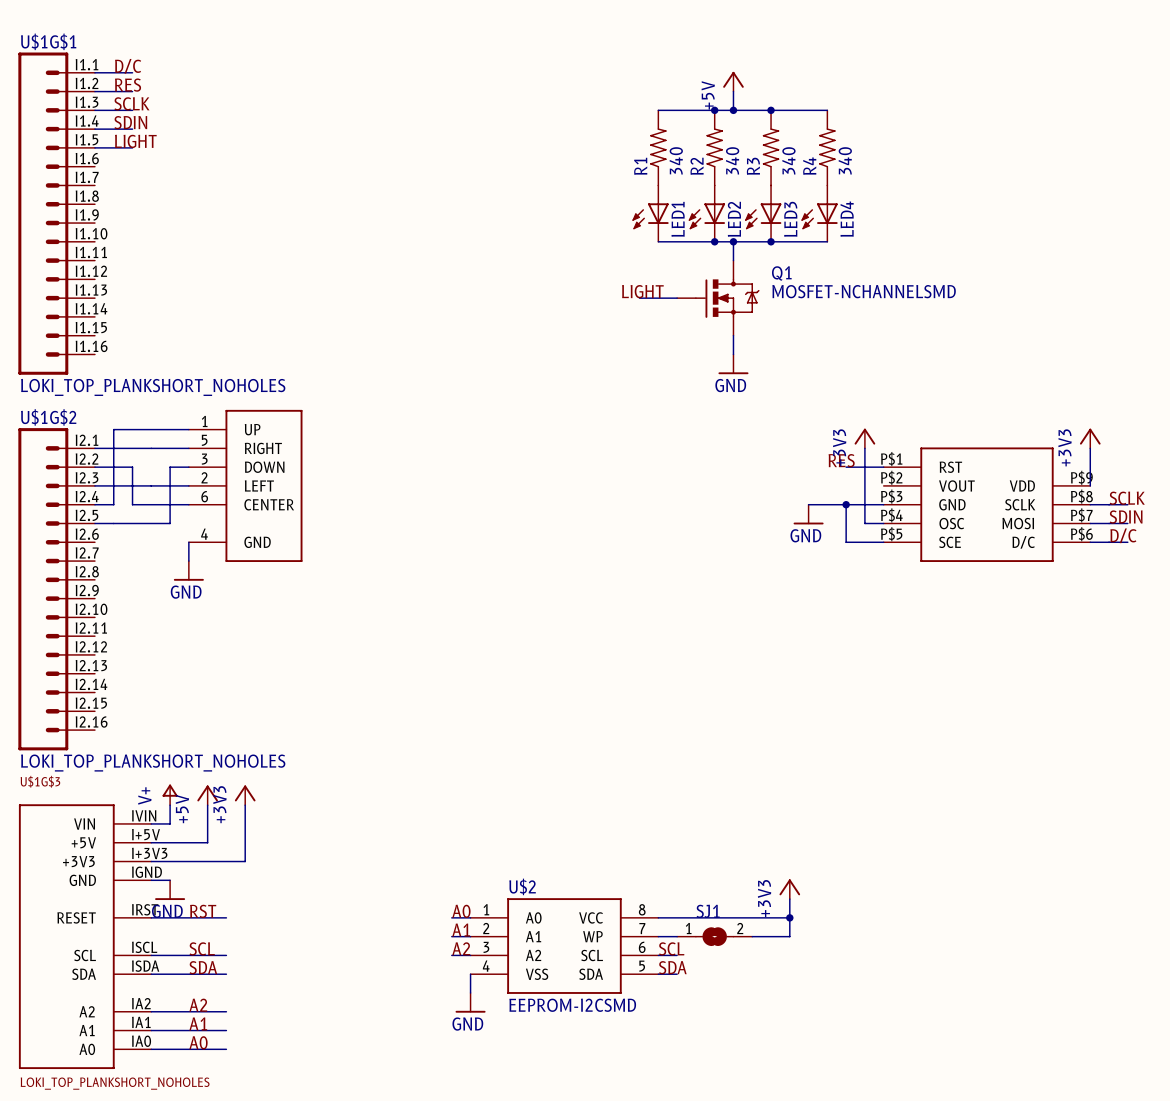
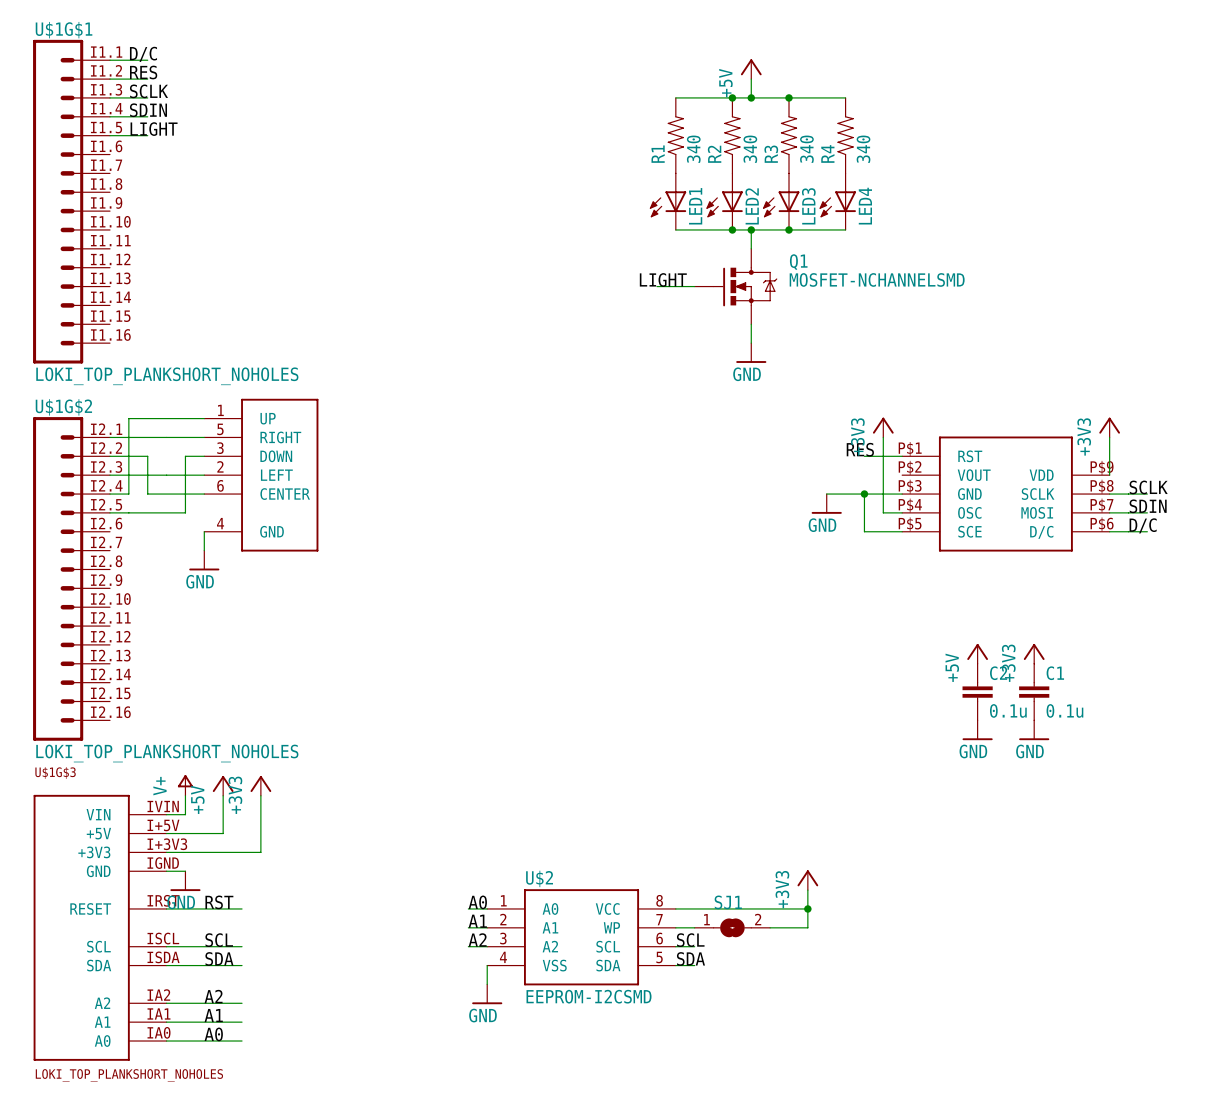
power symbol: none -> +5V (977, 653)
power symbol: none -> +3V3 (1034, 653)
C2: none -> 0.1u (977, 692)
C1: none -> 0.1u (1034, 692)
power symbol: none -> GND (977, 730)
power symbol: none -> GND (1034, 730)

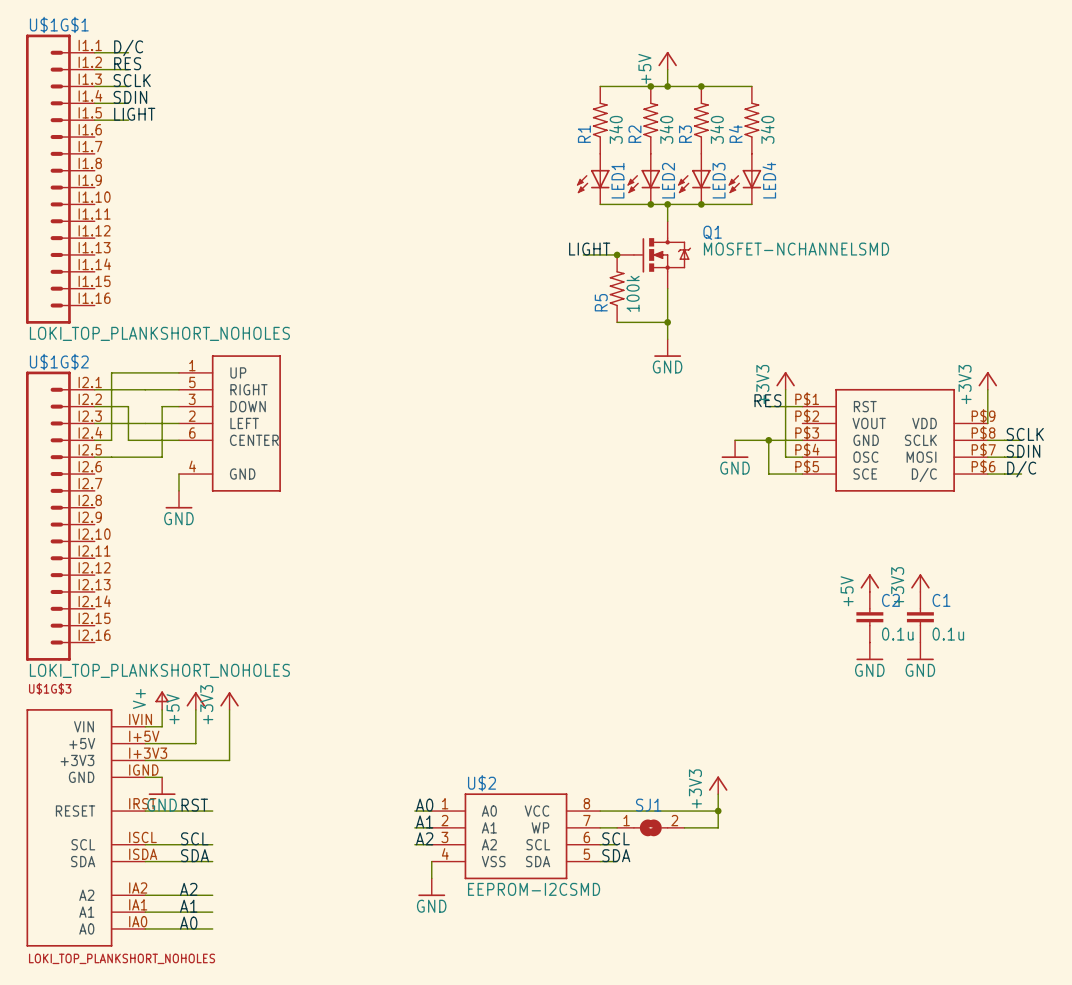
junction: none -> (617, 254)
R5: none -> 100k (617, 288)
power symbol position: GND (751, 353) -> GND (667, 348)
wire: none -> (617, 322) (667, 322)
junction: none -> (667, 322)

